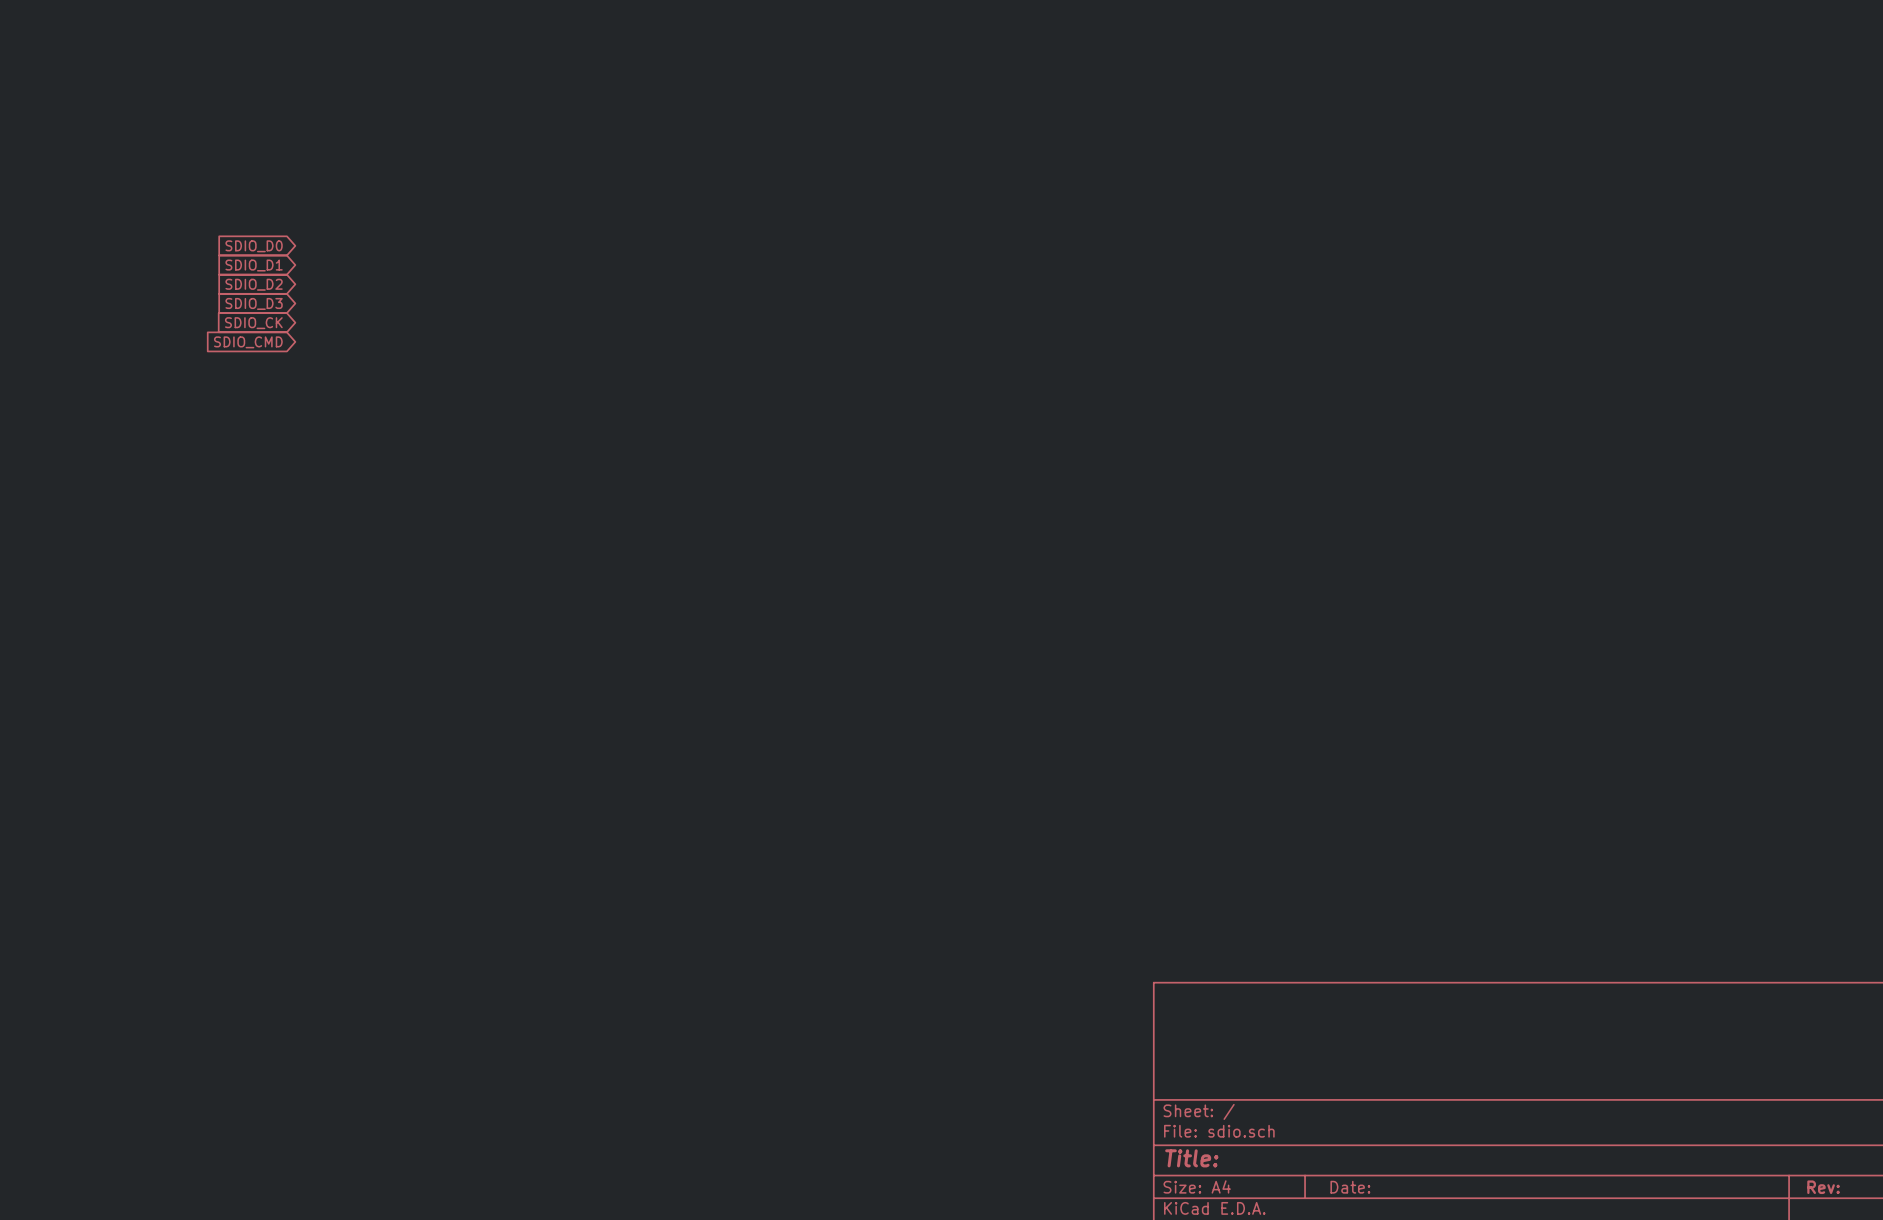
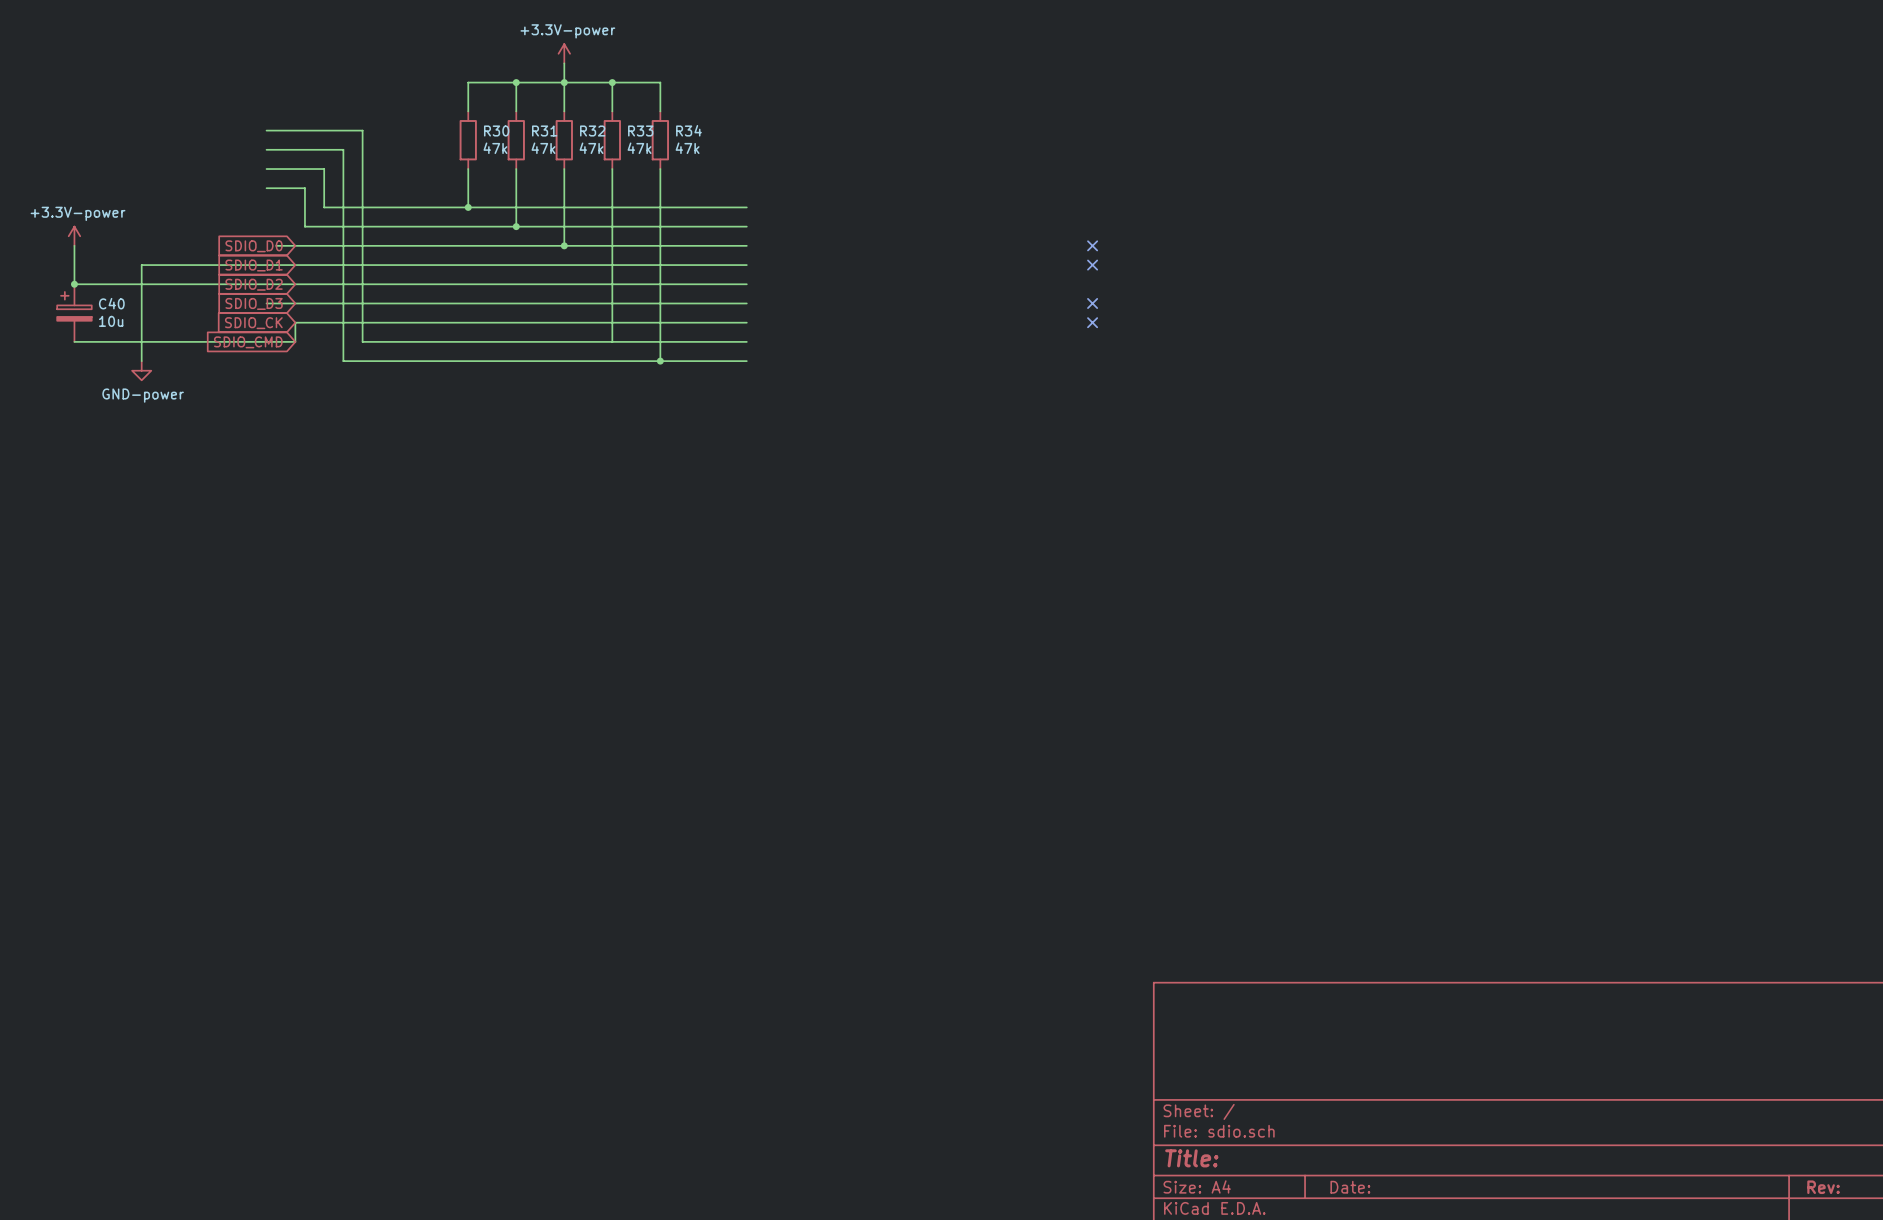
power symbol: none -> +3.3V-power (564, 53)
wire: none -> (564, 63) (564, 111)
wire: none -> (516, 82) (516, 111)
junction: none -> (516, 82)
junction: none -> (564, 82)
wire: none -> (612, 82) (612, 111)
junction: none -> (612, 82)
wire: none -> (468, 111) (468, 82) (660, 82) (660, 111)
wire: none -> (266, 130) (362, 130) (362, 341) (746, 341)
R30: none -> 47k (468, 140)
R31: none -> 47k (516, 140)
R32: none -> 47k (564, 140)
R33: none -> 47k (612, 140)
R34: none -> 47k (660, 140)
wire: none -> (266, 149) (343, 149) (343, 361) (746, 361)
wire: none -> (266, 169) (324, 169) (324, 207) (746, 207)
wire: none -> (468, 169) (468, 207)
wire: none -> (516, 169) (516, 226)
wire: none -> (564, 169) (564, 245)
wire: none -> (612, 169) (612, 341)
wire: none -> (660, 169) (660, 361)
wire: none -> (266, 188) (304, 188) (304, 226) (746, 226)
junction: none -> (468, 207)
junction: none -> (516, 226)
power symbol: none -> +3.3V-power (74, 236)
wire: none -> (74, 245) (74, 284) (746, 284)
wire: none -> (276, 245) (746, 245)
junction: none -> (564, 245)
no-connect mark: none -> (1092, 245)
wire: none -> (746, 265) (141, 265) (141, 361)
no-connect mark: none -> (1092, 265)
junction: none -> (74, 284)
wire: none -> (266, 303) (746, 303)
no-connect mark: none -> (1092, 303)
C40: none -> 10u (74, 313)
wire: none -> (746, 322) (295, 322) (295, 341) (74, 341)
no-connect mark: none -> (1092, 322)
junction: none -> (660, 361)
power symbol: none -> GND-power (141, 370)

